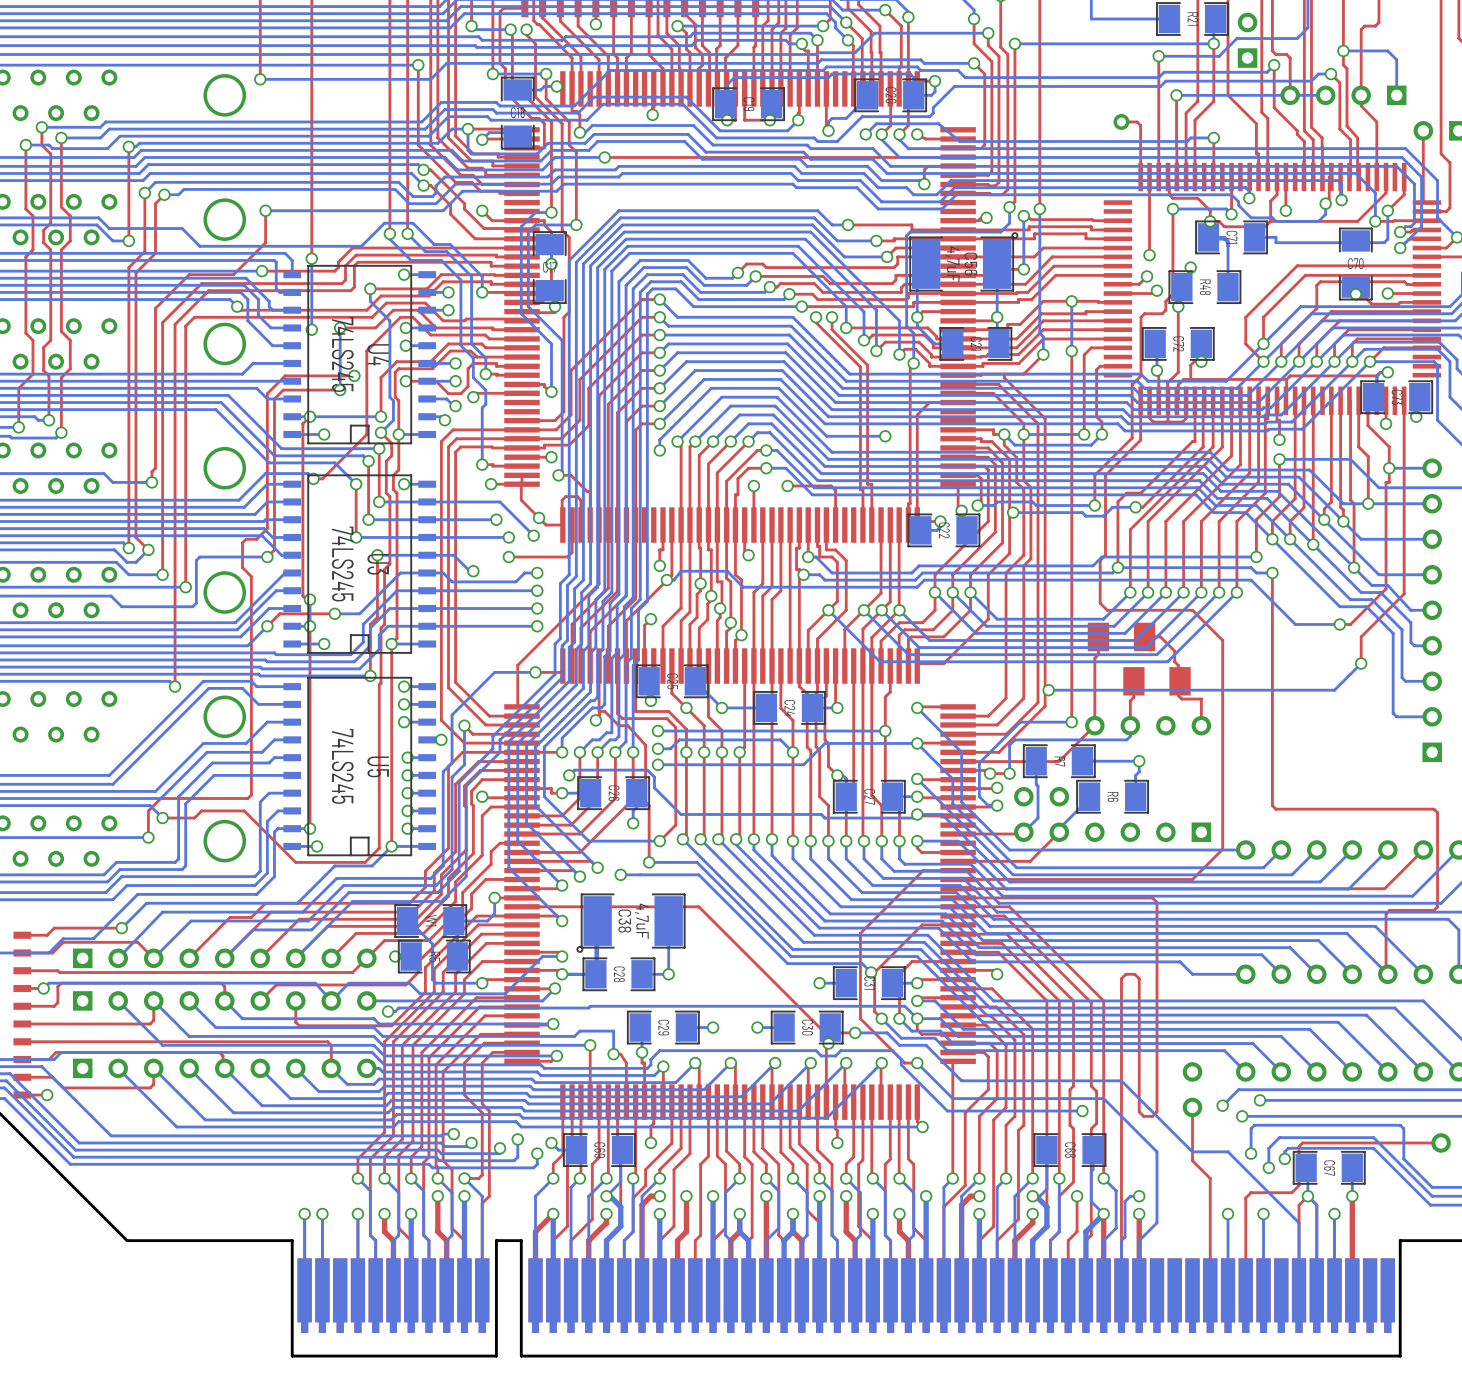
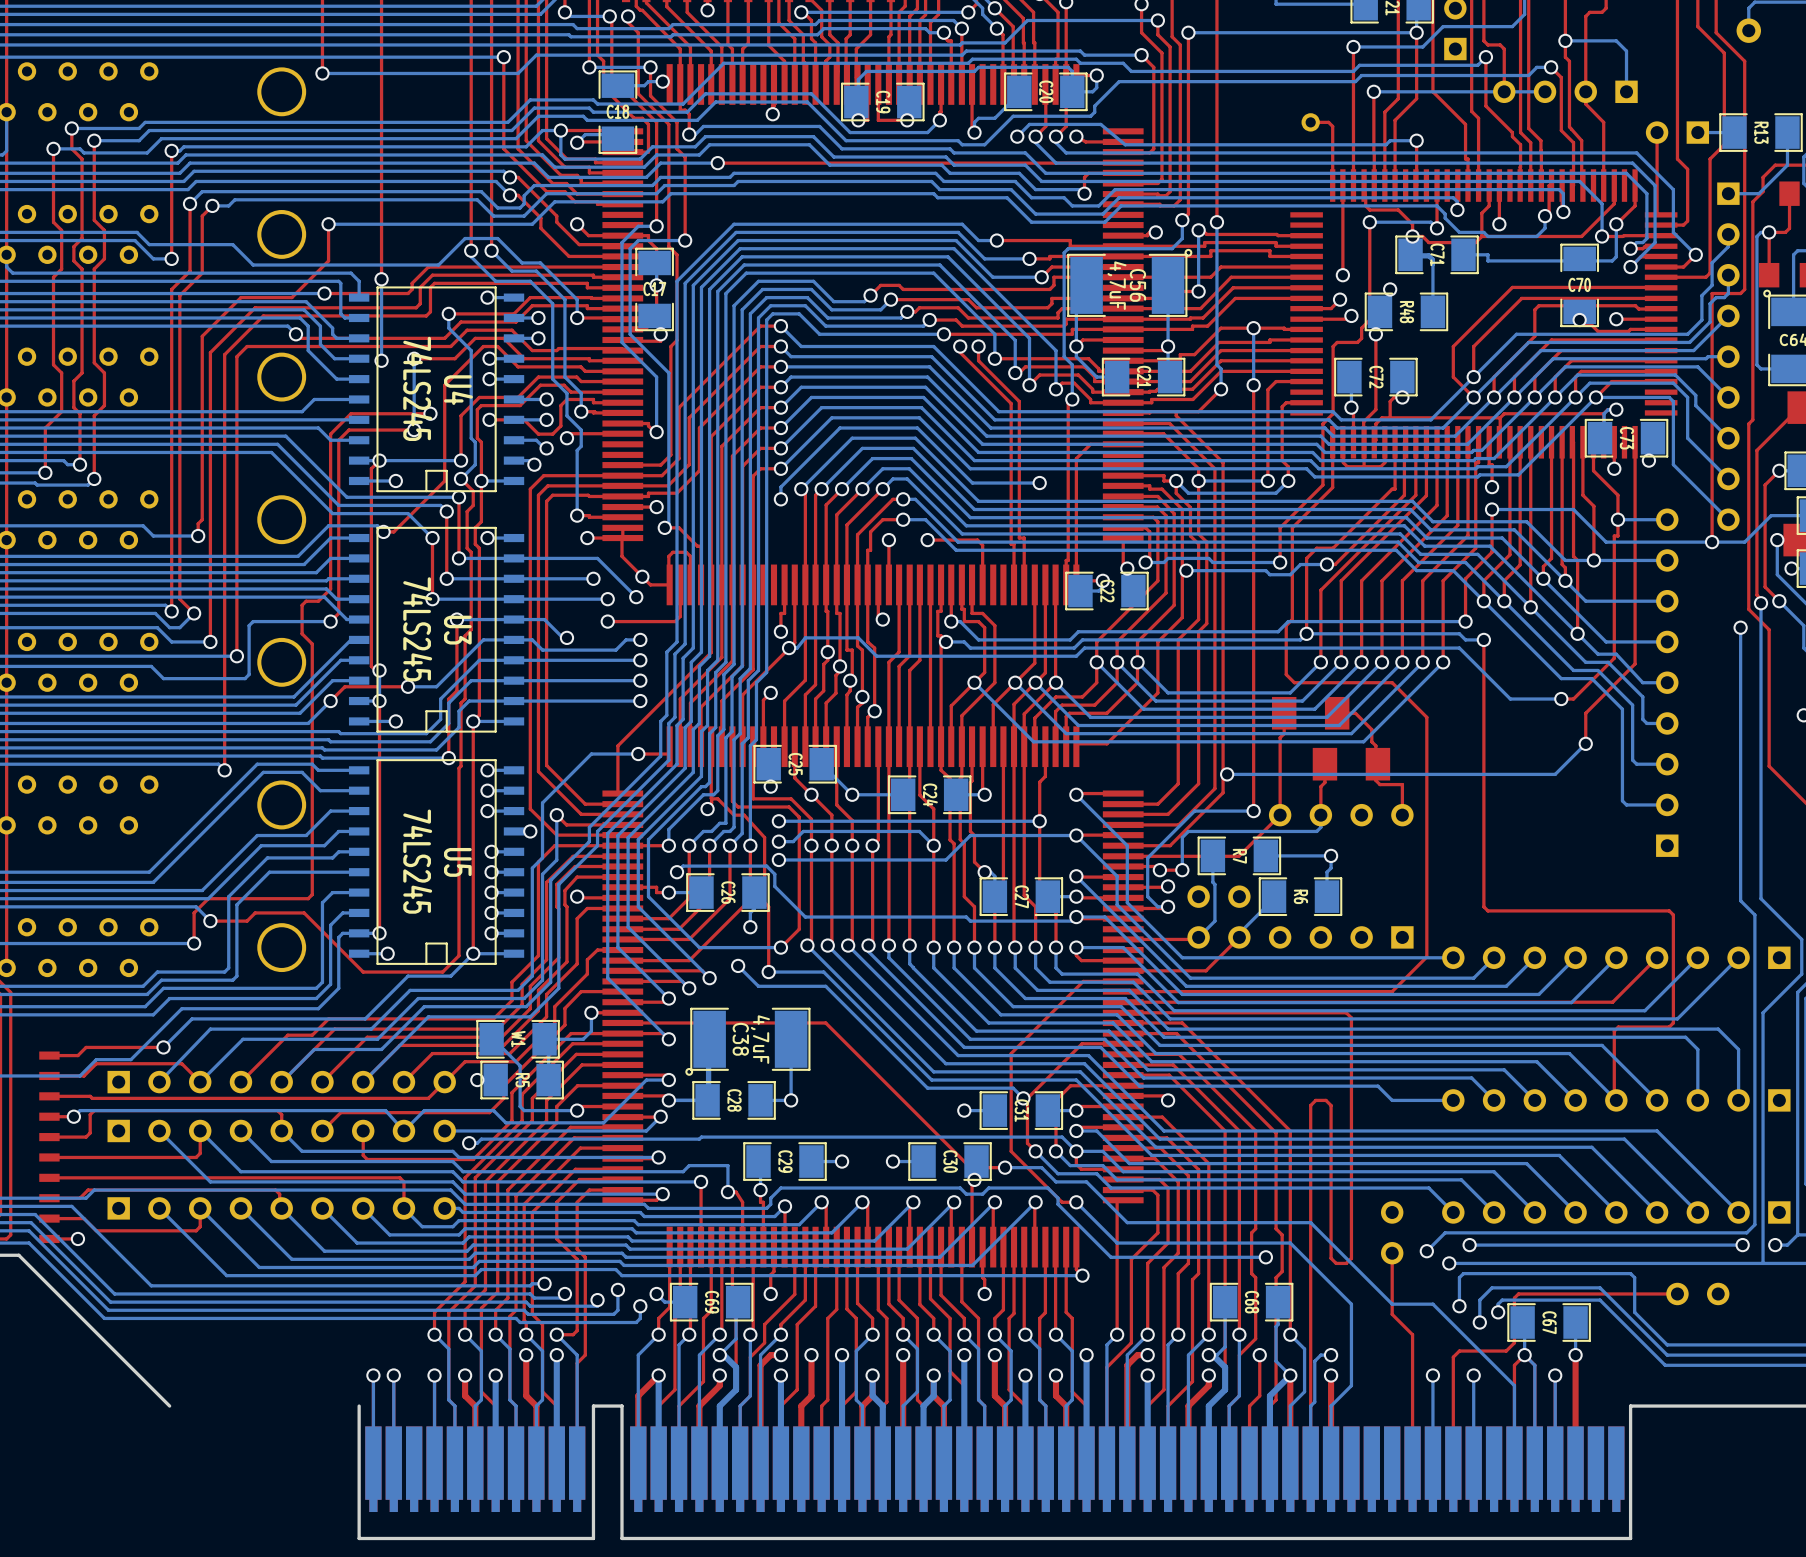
via position: (620, 874) -> (738, 965)
bottom track: (640, 874) (620, 874) -> (758, 986) (738, 965)
board edge: (292, 1240) (127, 1240) -> none

